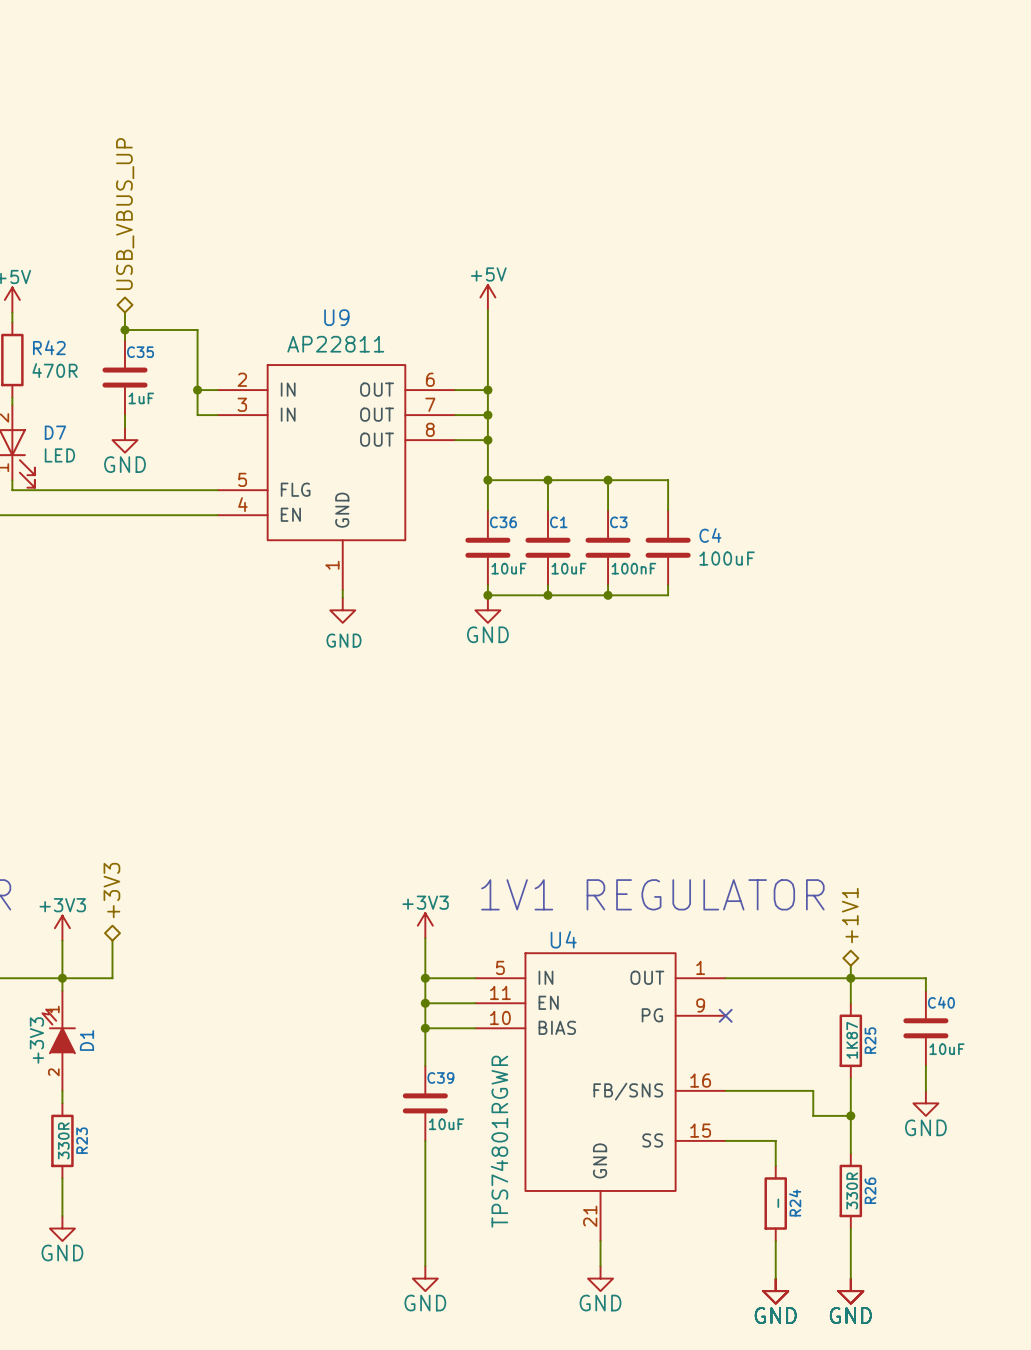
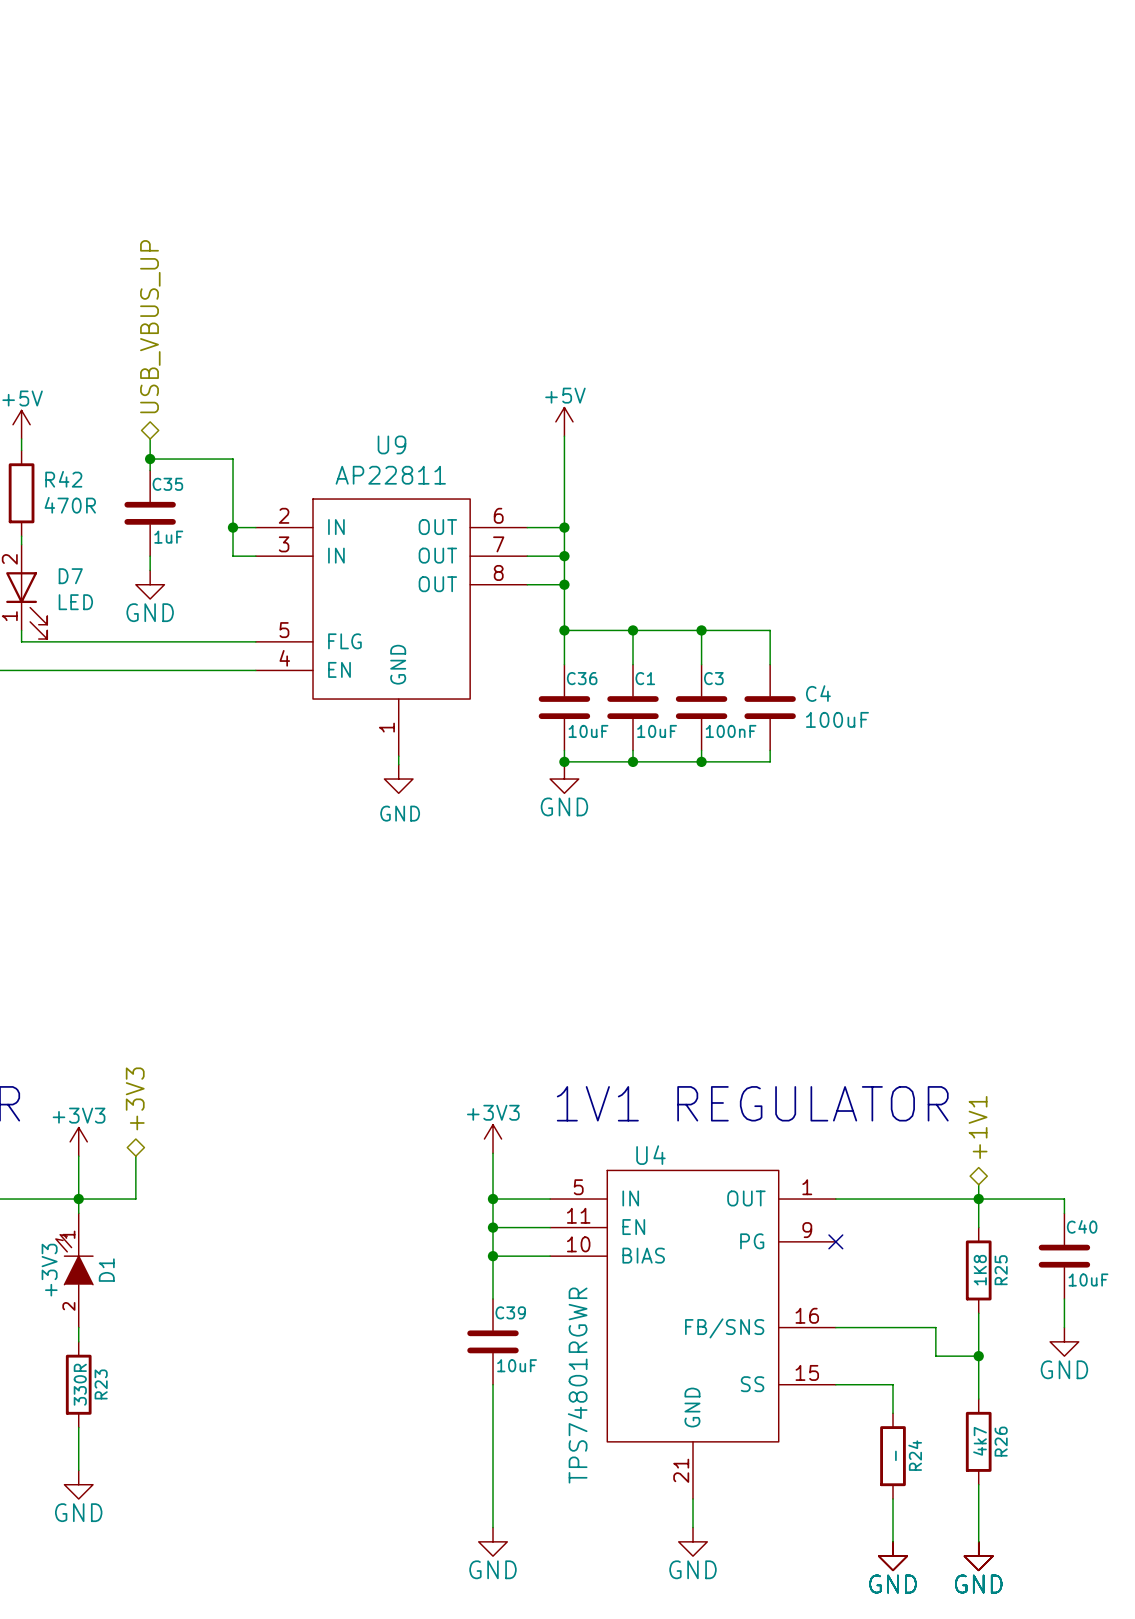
R25 value: 1K87 (852, 1040) -> 1K8 (980, 1270)
R26 value: 330R (852, 1190) -> 4k7 (980, 1441)

